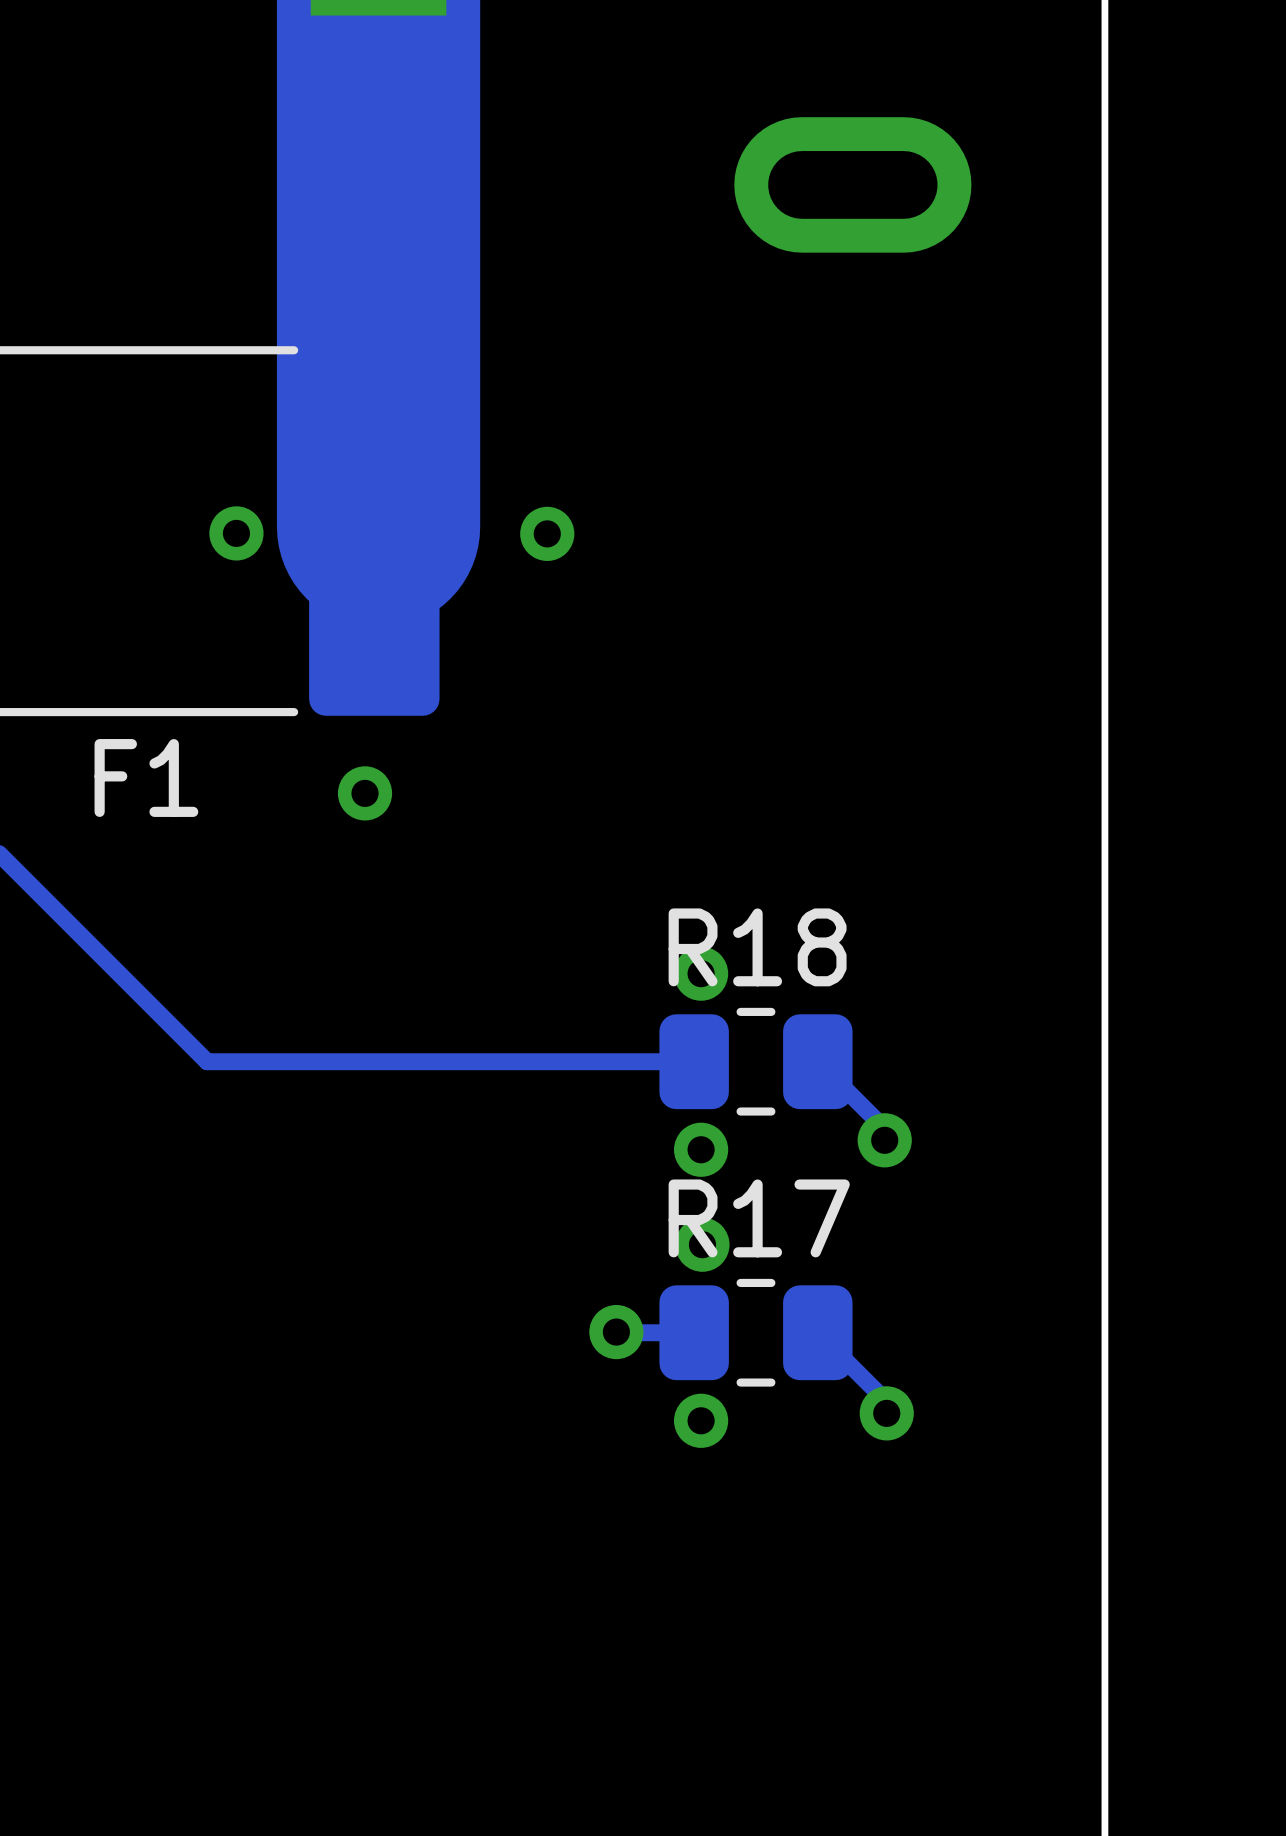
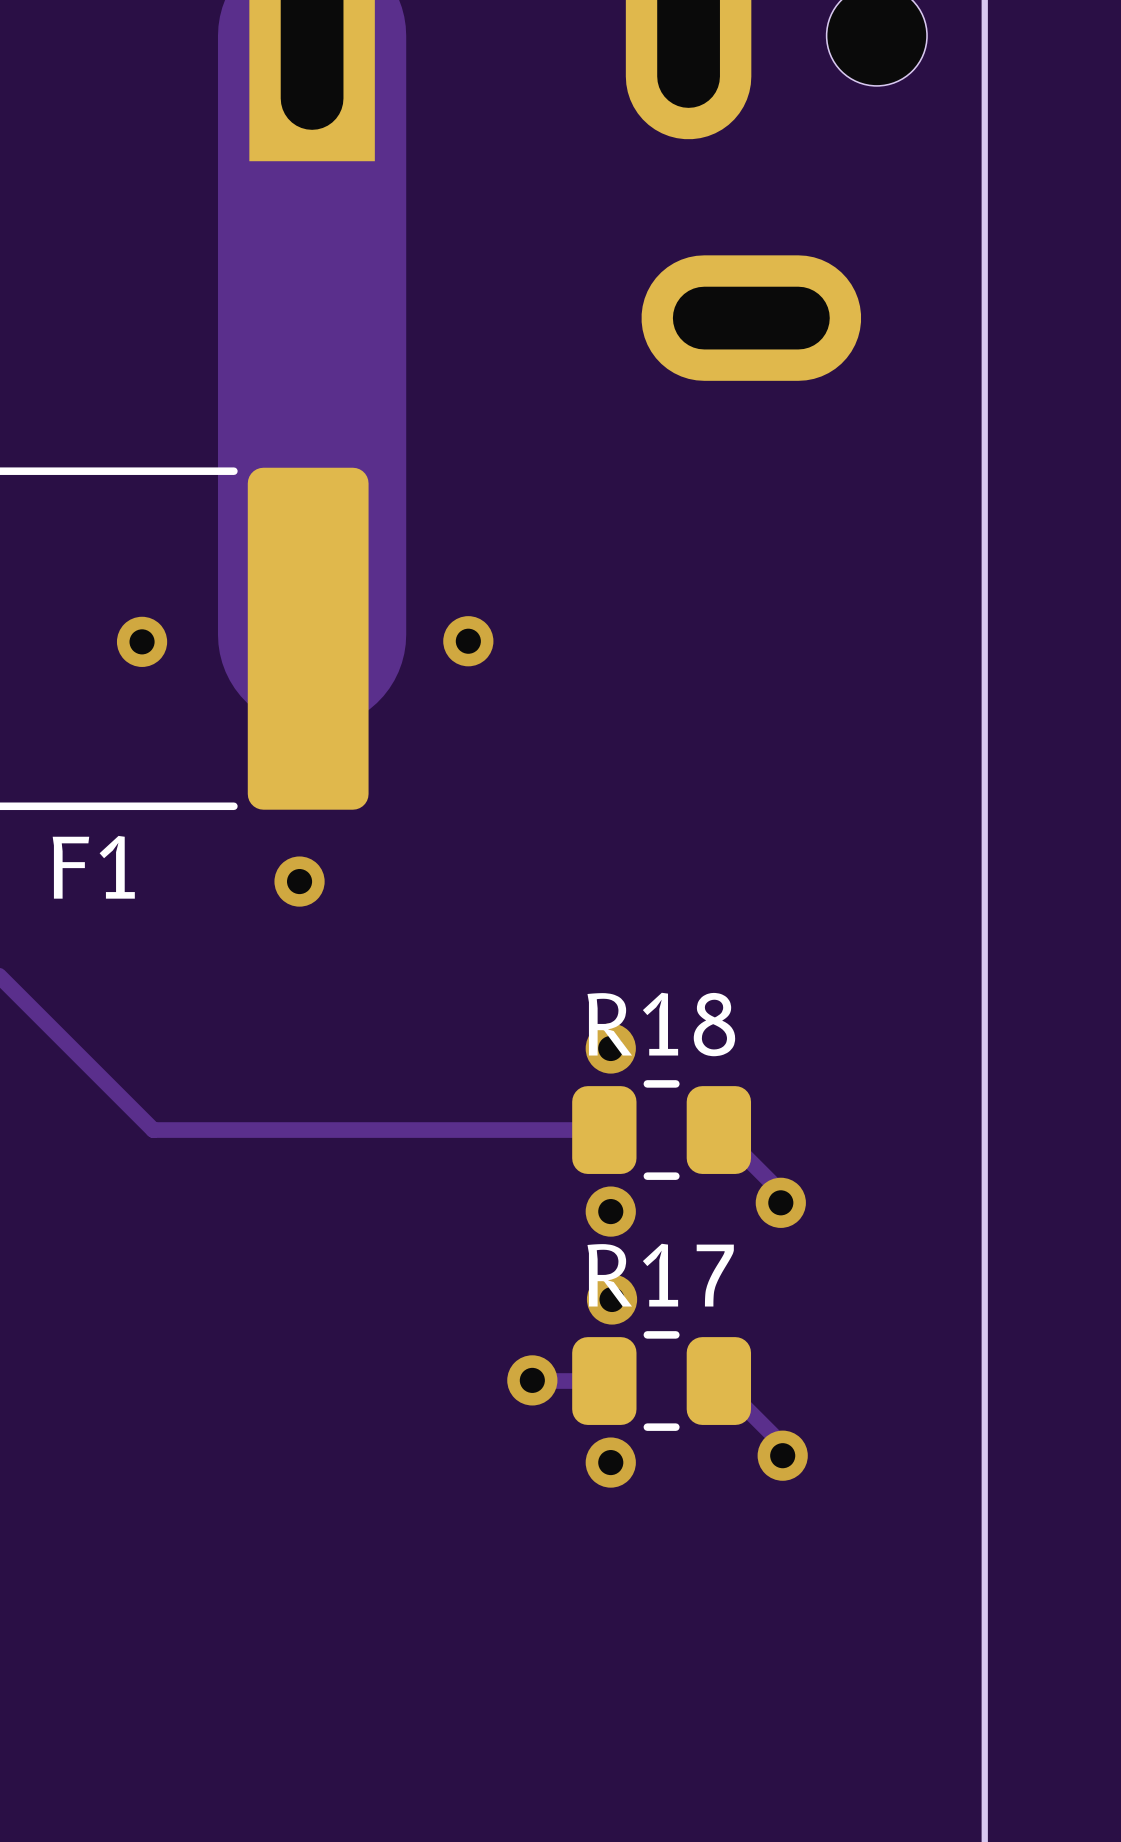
via position: (236, 533) -> (142, 641)

